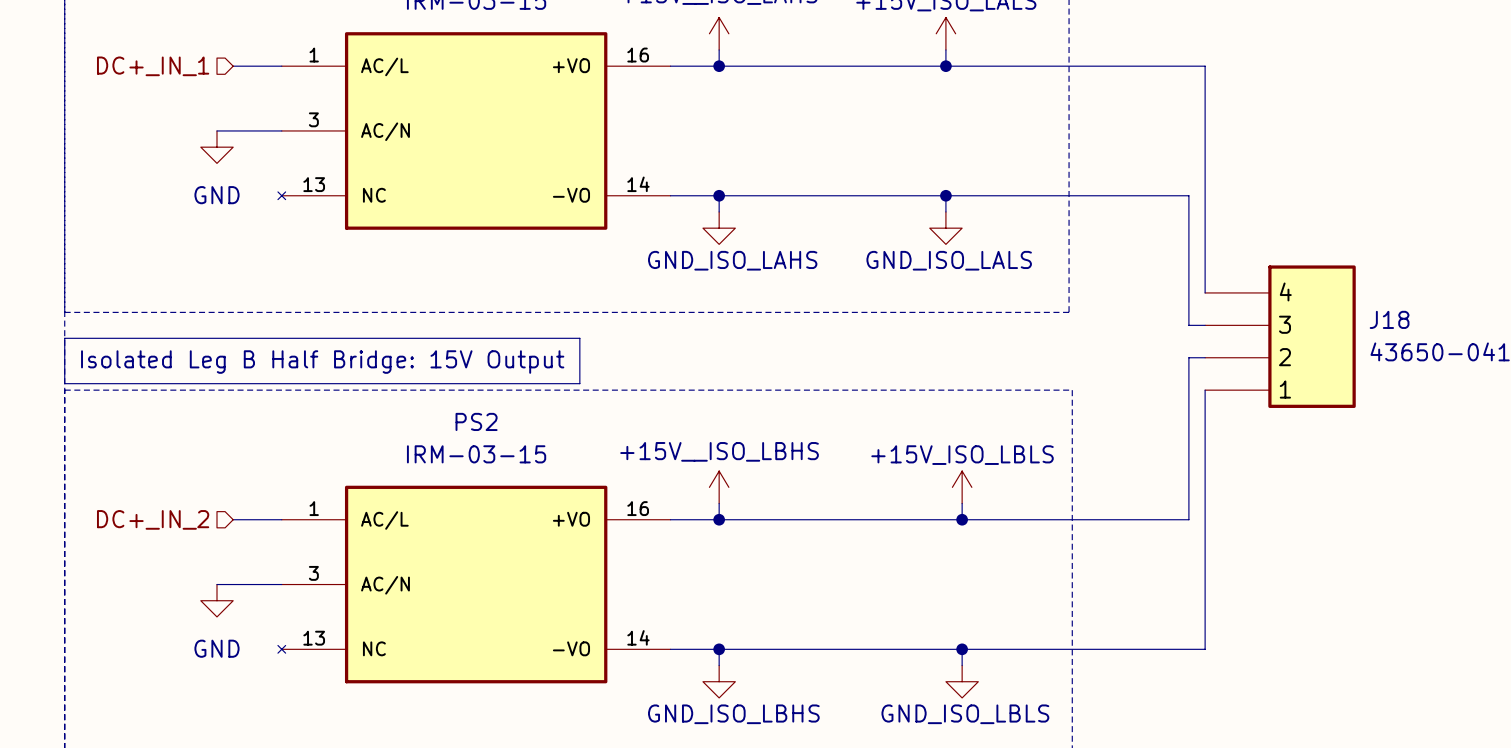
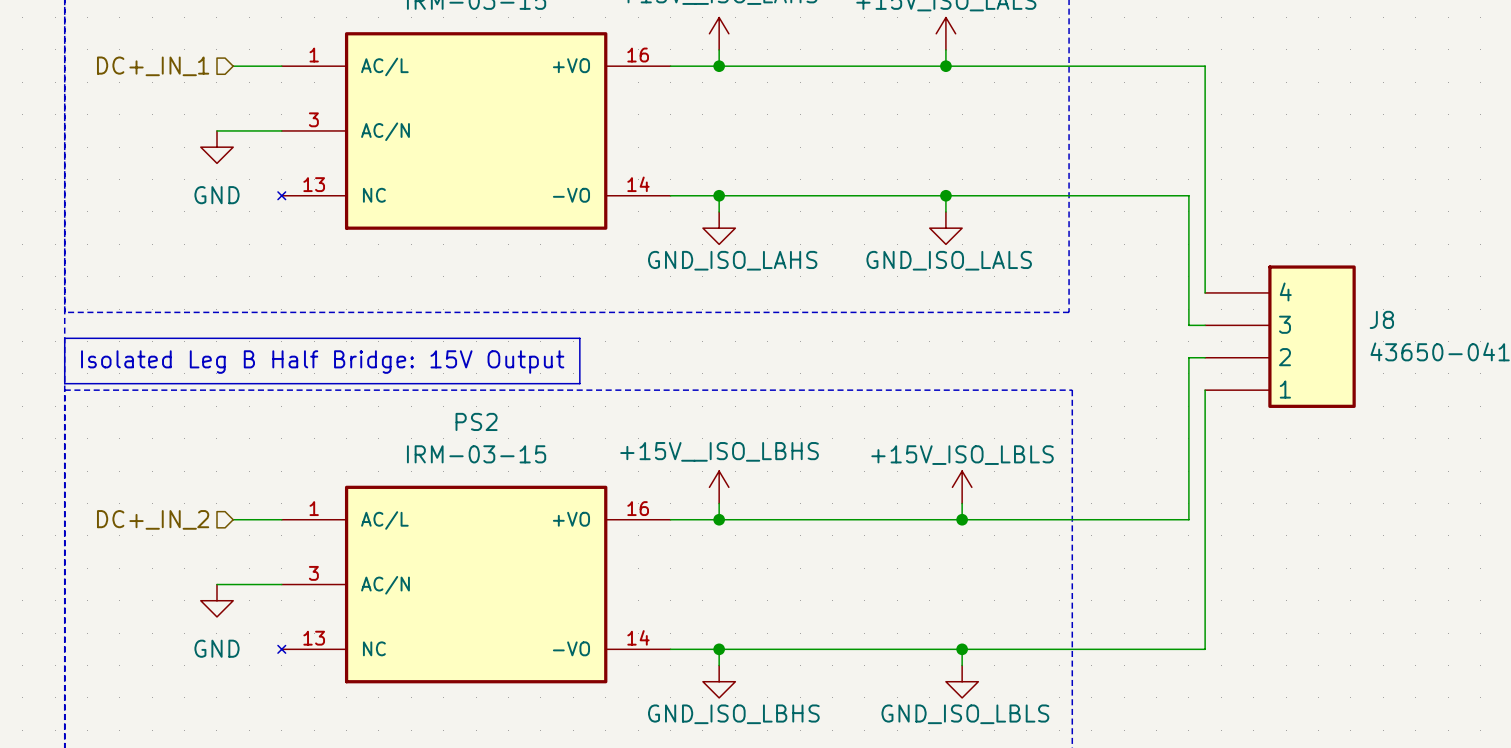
J18 name: J18 (1389, 319) -> J8 (1381, 319)

